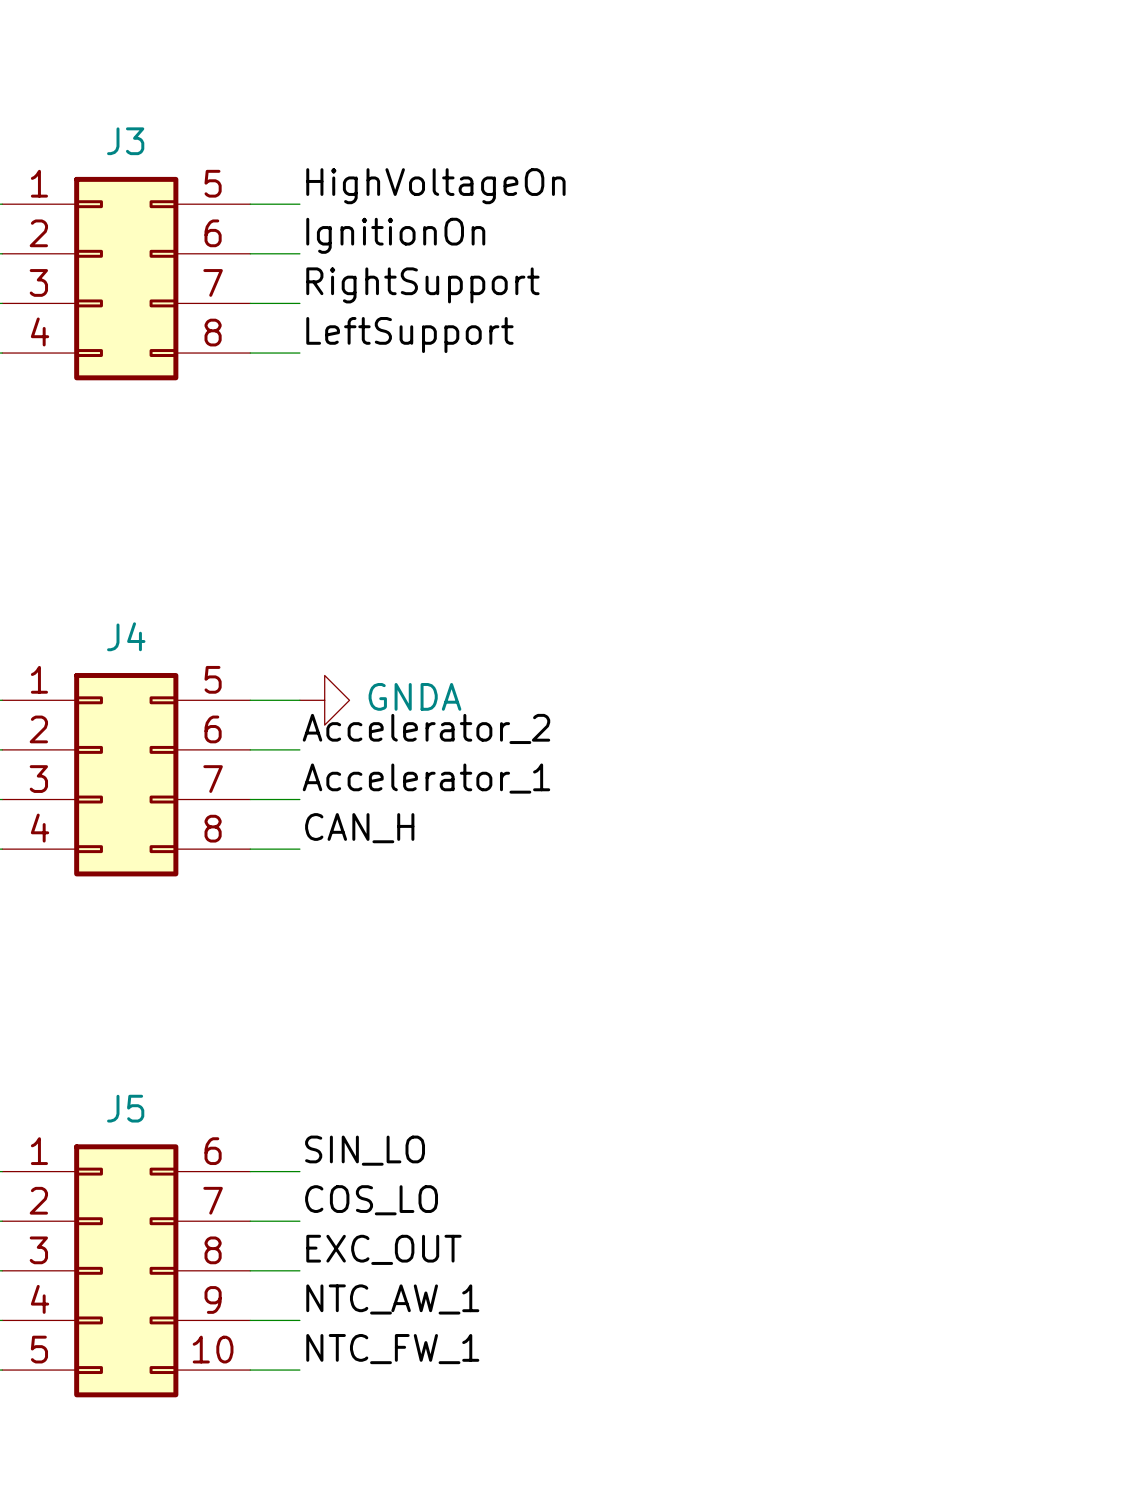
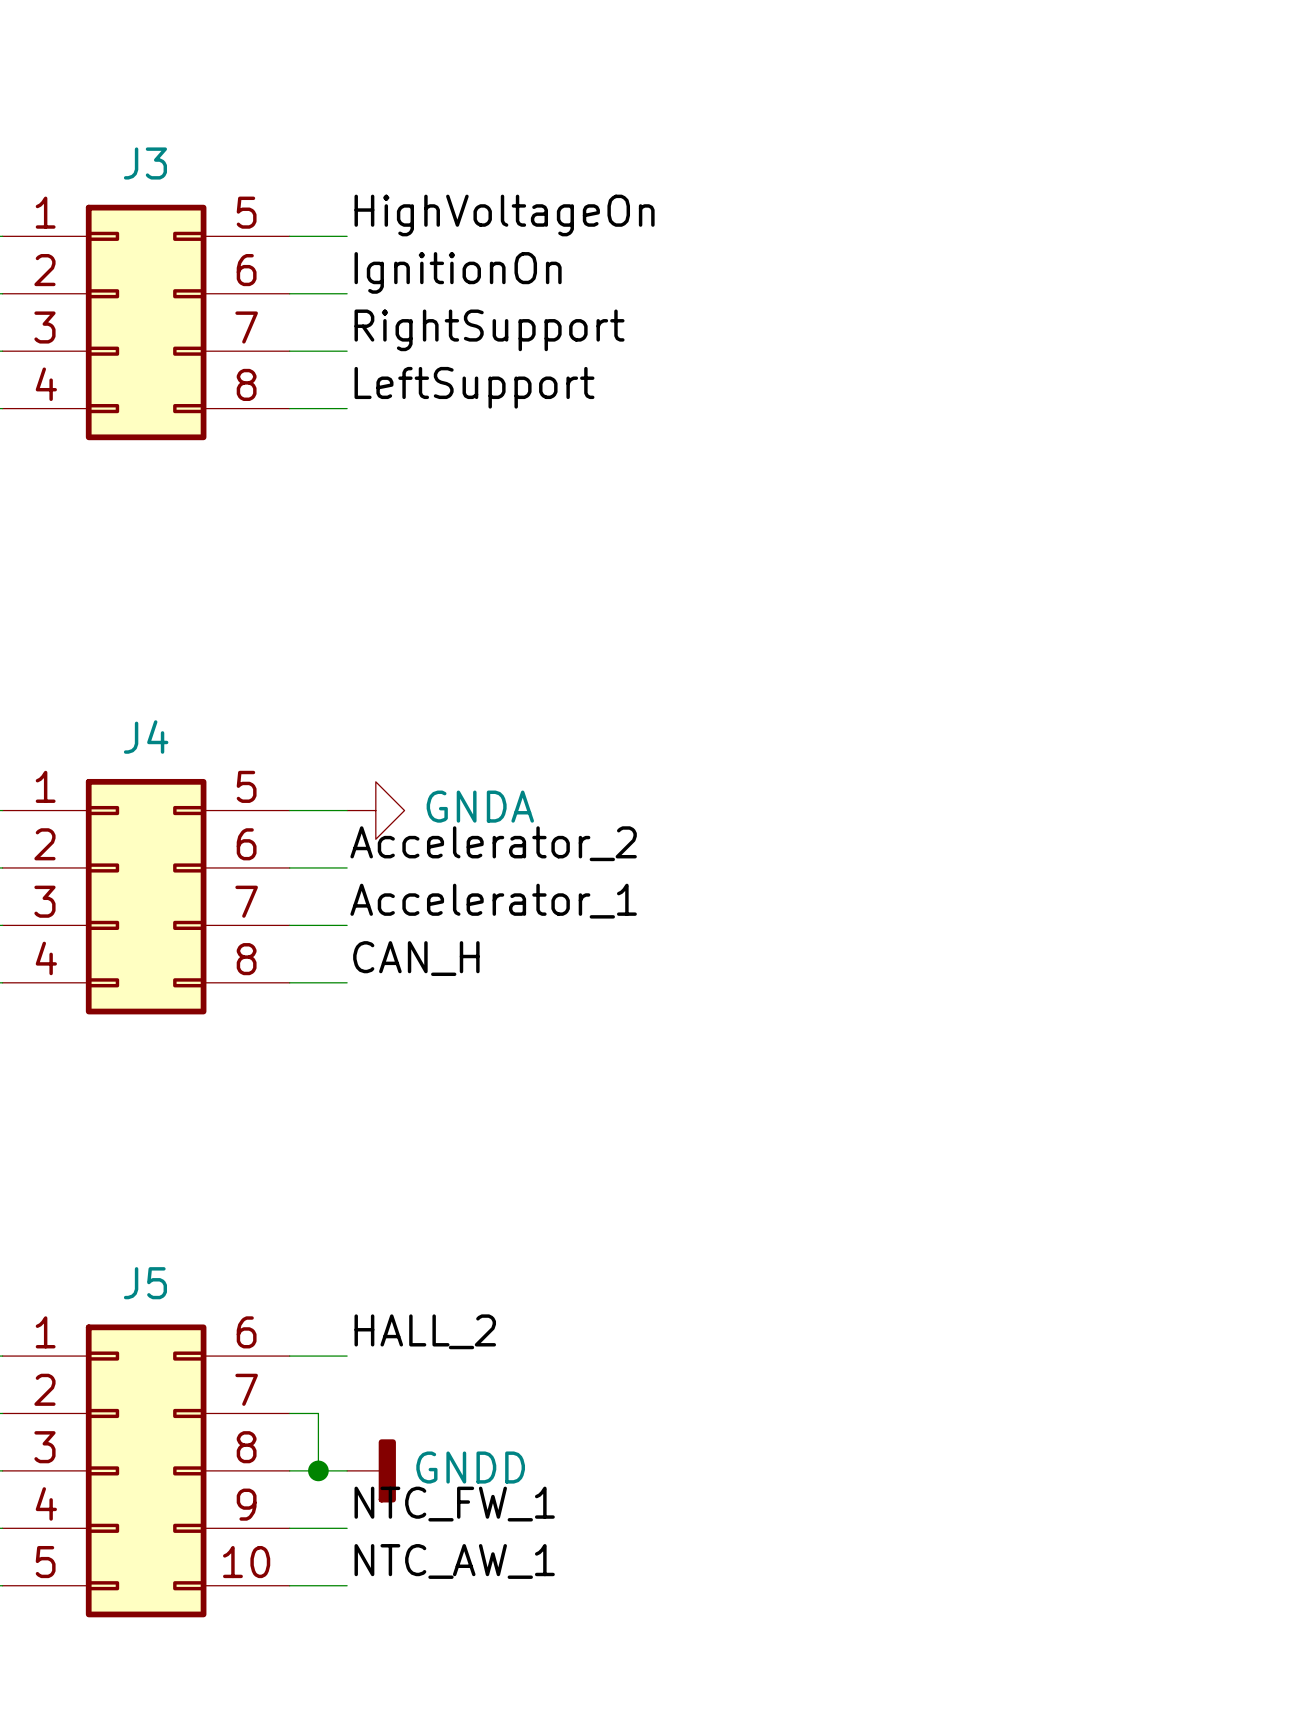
label: SIN_LO (365, 1150) -> HALL_2 (425, 1331)
label: COS_LO (371, 1200) -> none
wire: (275, 1221) (299, 1221) -> (318, 1413) (318, 1470)
label: EXC_OUT (383, 1249) -> none
junction: none -> (318, 1470)
power symbol: none -> GNDD (371, 1470)
label: NTC_AW_1 (392, 1299) -> NTC_FW_1 (454, 1504)
label: NTC_FW_1 (392, 1349) -> NTC_AW_1 (454, 1561)

